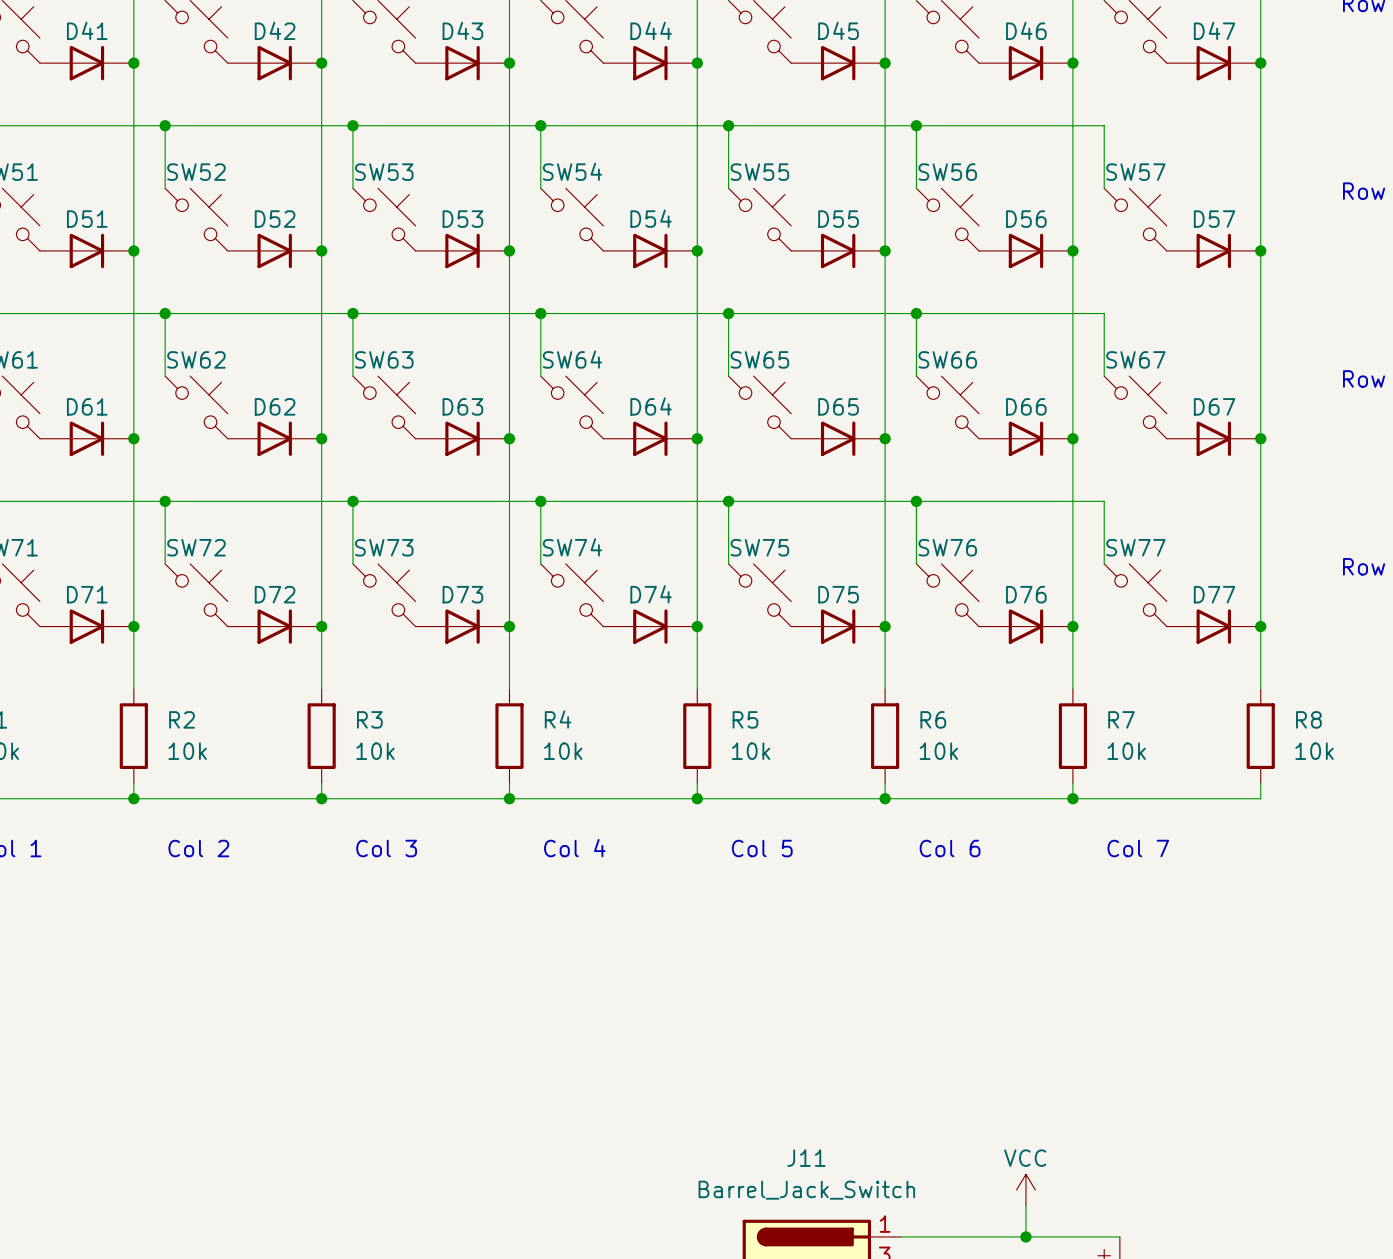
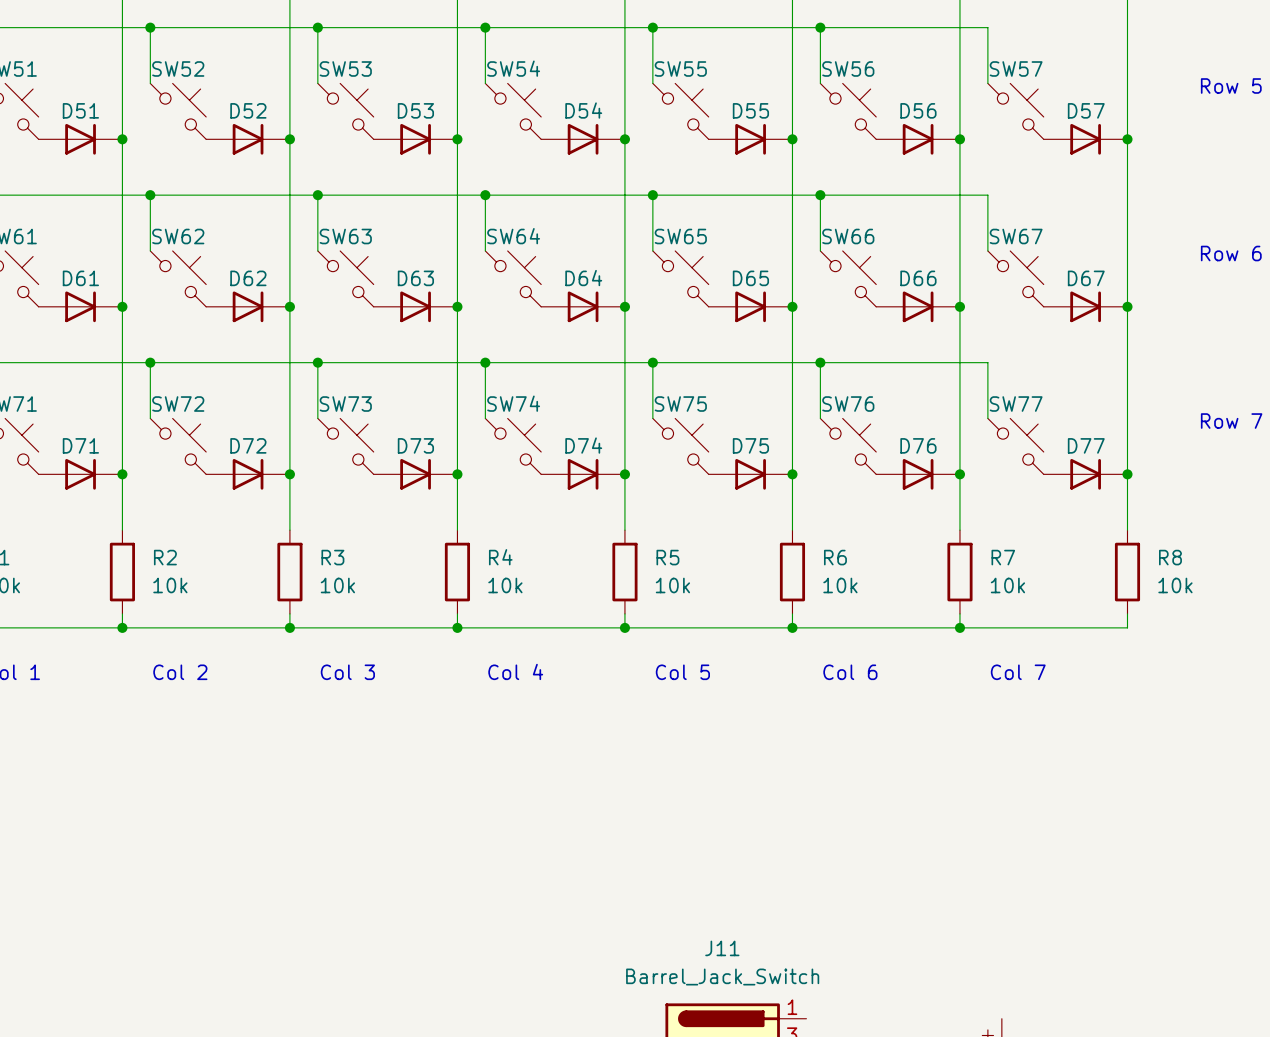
power symbol: VCC (1025, 1190) -> none
wire: (1025, 1205) (1025, 1236) -> none
wire: (900, 1236) (1119, 1236) -> none
junction: (1025, 1236) -> none

